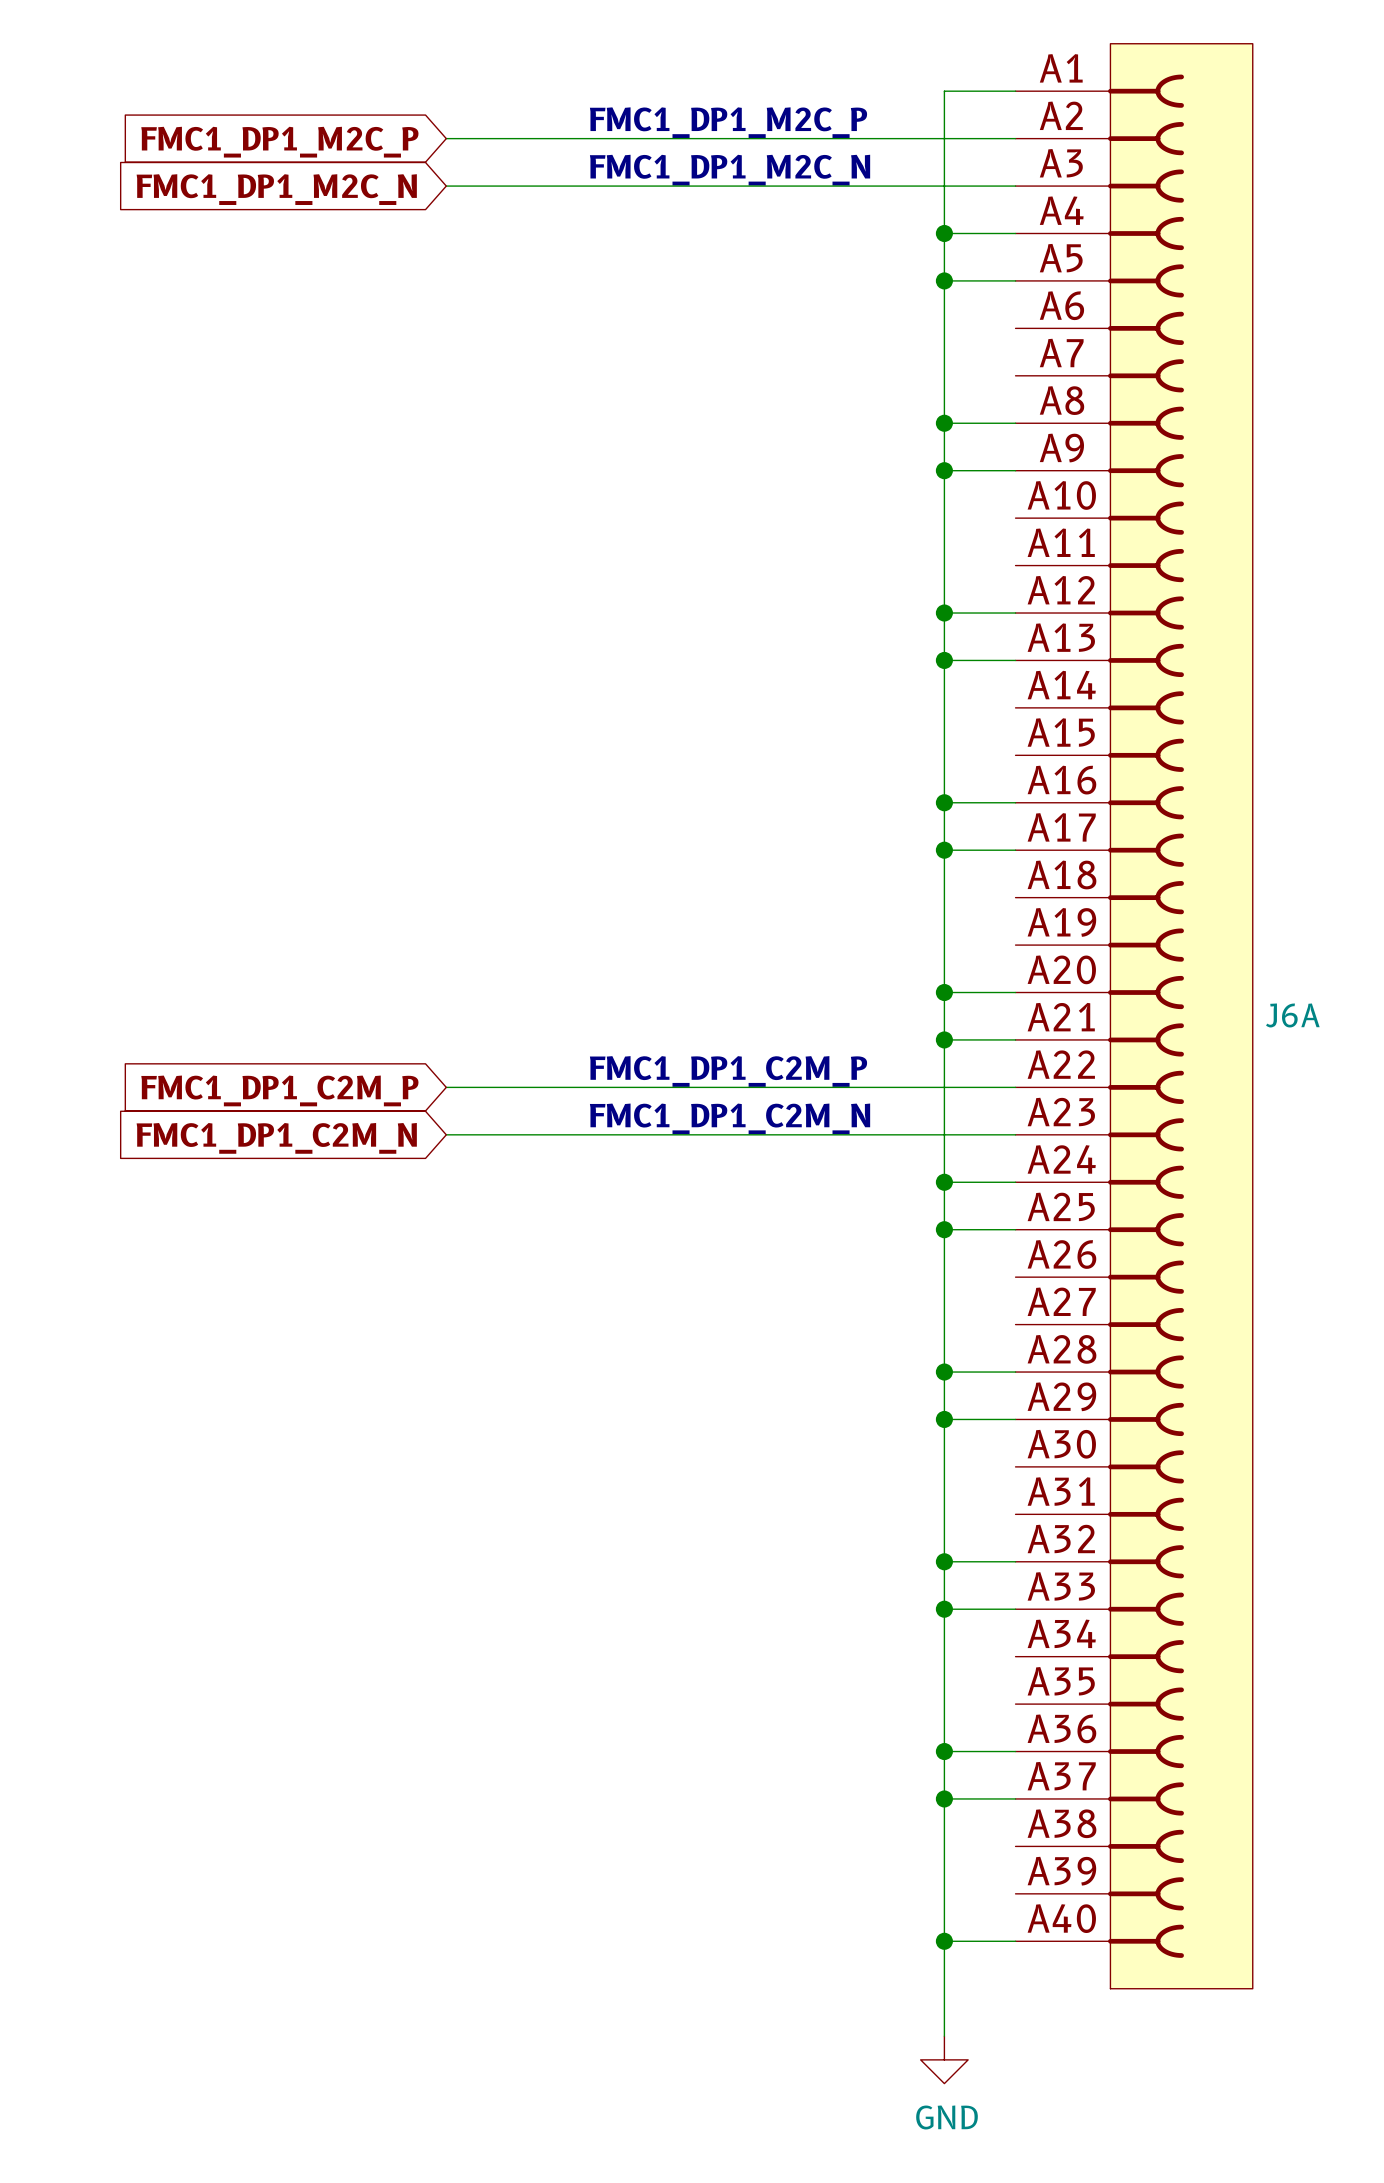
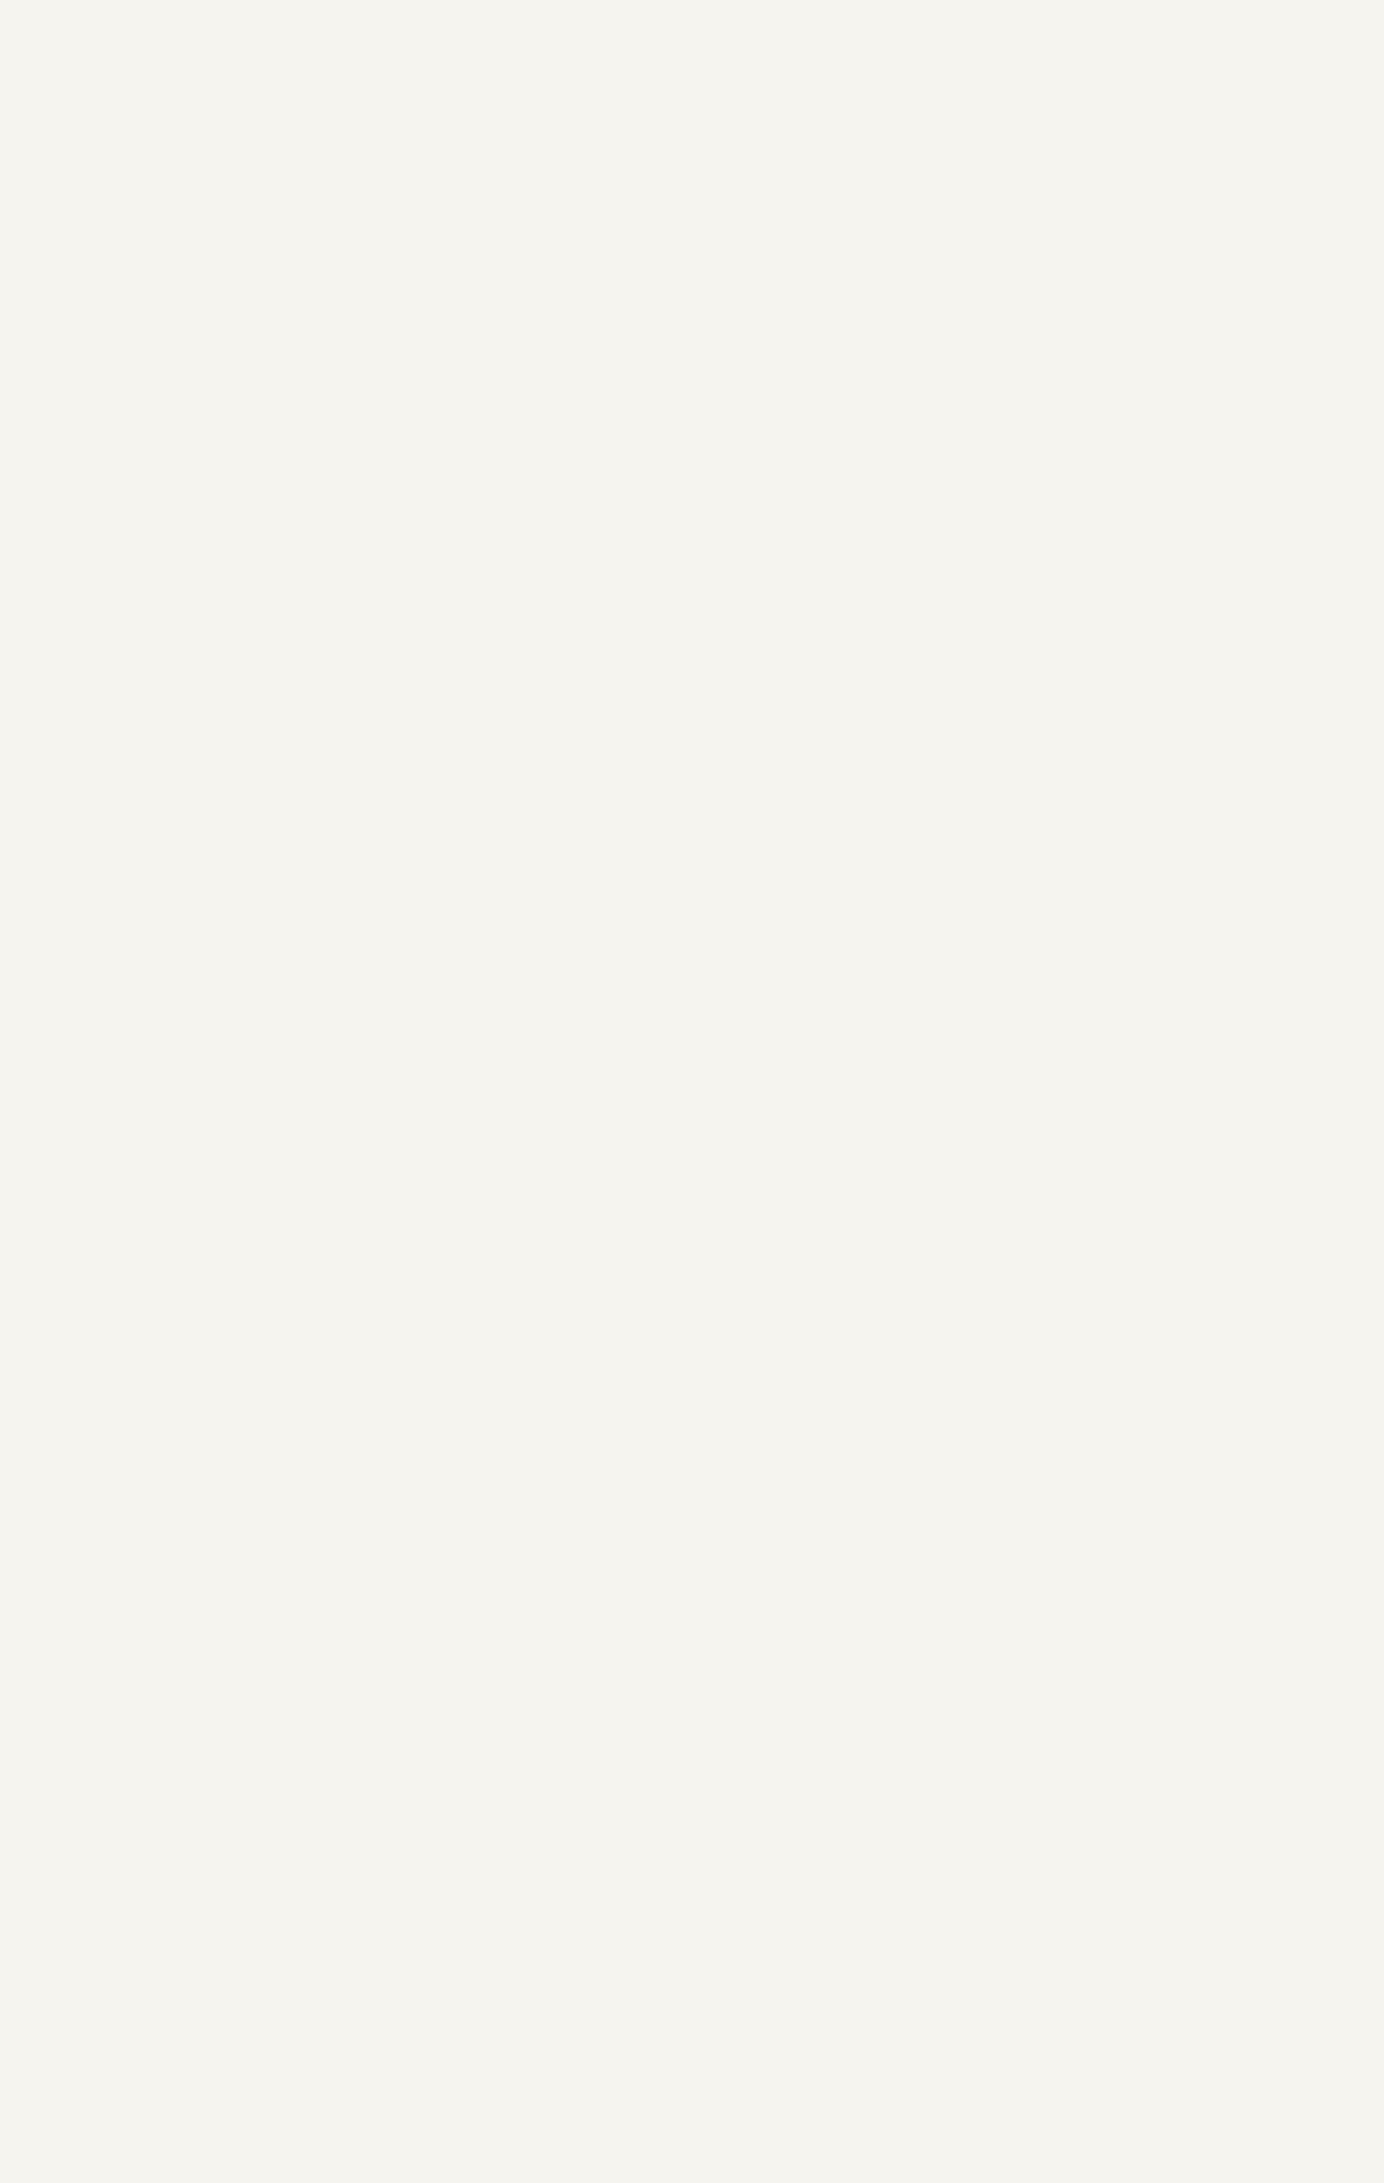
wire: (1015, 91) (944, 91) (944, 2036) -> none
text: FMC1_DP1_M2C_P (728, 122) -> none
wire: (446, 138) (1015, 138) -> none
global label: FMC1_DP1_M2C_P (279, 142) -> none
text: FMC1_DP1_M2C_N (730, 170) -> none
wire: (446, 186) (1015, 186) -> none
global label: FMC1_DP1_M2C_N (276, 189) -> none
wire: (944, 233) (1015, 233) -> none
junction: (944, 233) -> none
wire: (944, 280) (1015, 280) -> none
junction: (944, 280) -> none
wire: (944, 423) (1015, 423) -> none
junction: (944, 423) -> none
wire: (944, 470) (1015, 470) -> none
junction: (944, 470) -> none
wire: (944, 613) (1015, 613) -> none
junction: (944, 613) -> none
wire: (944, 660) (1015, 660) -> none
junction: (944, 660) -> none
wire: (944, 802) (1015, 802) -> none
junction: (944, 802) -> none
wire: (944, 850) (1015, 850) -> none
junction: (944, 850) -> none
wire: (944, 992) (1015, 992) -> none
junction: (944, 992) -> none
J6A: (1134, 1016) -> none
wire: (944, 1039) (1015, 1039) -> none
junction: (944, 1039) -> none
text: FMC1_DP1_C2M_P (728, 1071) -> none
wire: (446, 1087) (1015, 1087) -> none
global label: FMC1_DP1_C2M_P (279, 1090) -> none
text: FMC1_DP1_C2M_N (730, 1118) -> none
wire: (446, 1134) (1015, 1134) -> none
global label: FMC1_DP1_C2M_N (276, 1138) -> none
wire: (944, 1182) (1015, 1182) -> none
junction: (944, 1182) -> none
wire: (944, 1229) (1015, 1229) -> none
junction: (944, 1229) -> none
wire: (944, 1372) (1015, 1372) -> none
junction: (944, 1372) -> none
wire: (944, 1419) (1015, 1419) -> none
junction: (944, 1419) -> none
wire: (944, 1561) (1015, 1561) -> none
junction: (944, 1561) -> none
wire: (944, 1609) (1015, 1609) -> none
junction: (944, 1609) -> none
wire: (944, 1751) (1015, 1751) -> none
junction: (944, 1751) -> none
wire: (944, 1798) (1015, 1798) -> none
junction: (944, 1798) -> none
wire: (944, 1941) (1015, 1941) -> none
junction: (944, 1941) -> none
power symbol: GND (944, 2059) -> none

